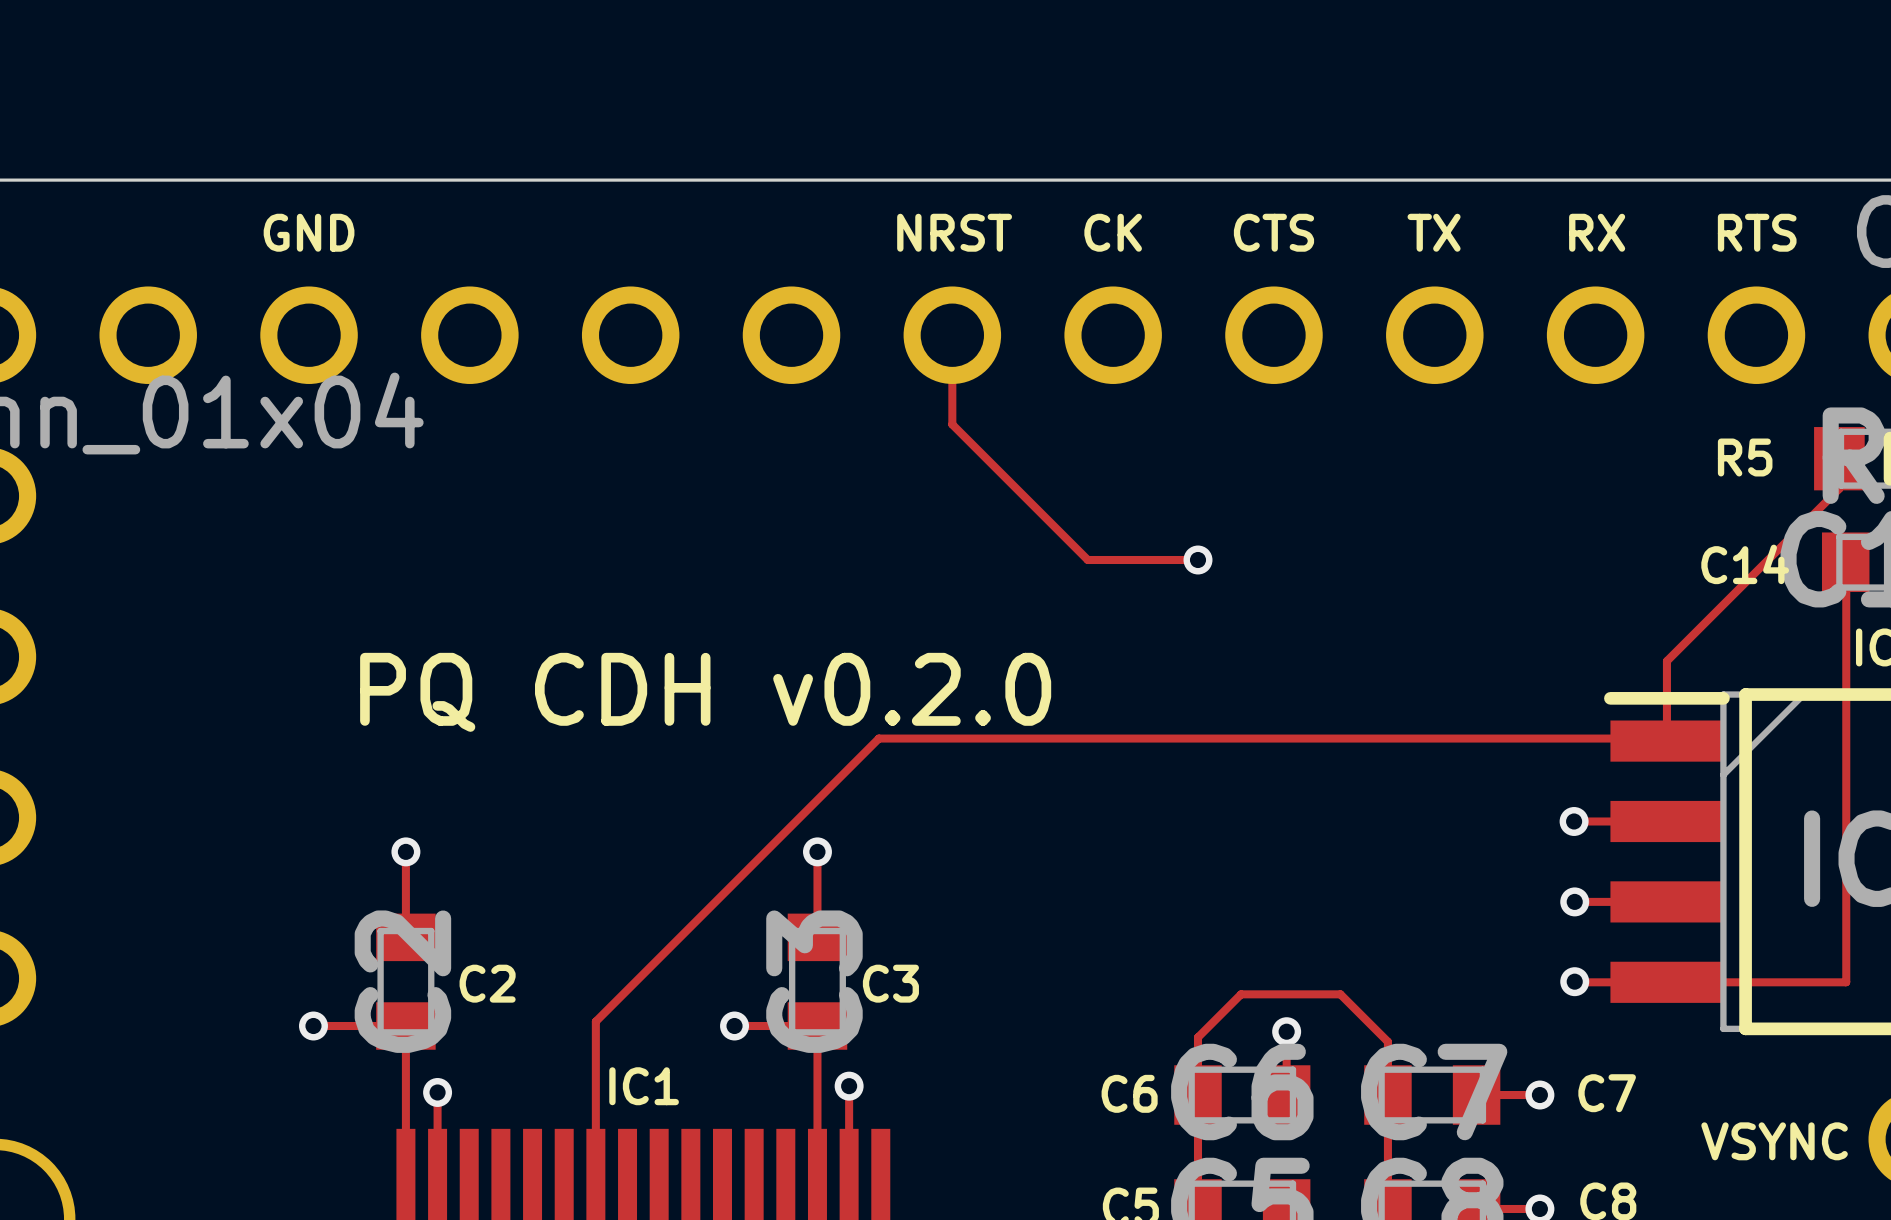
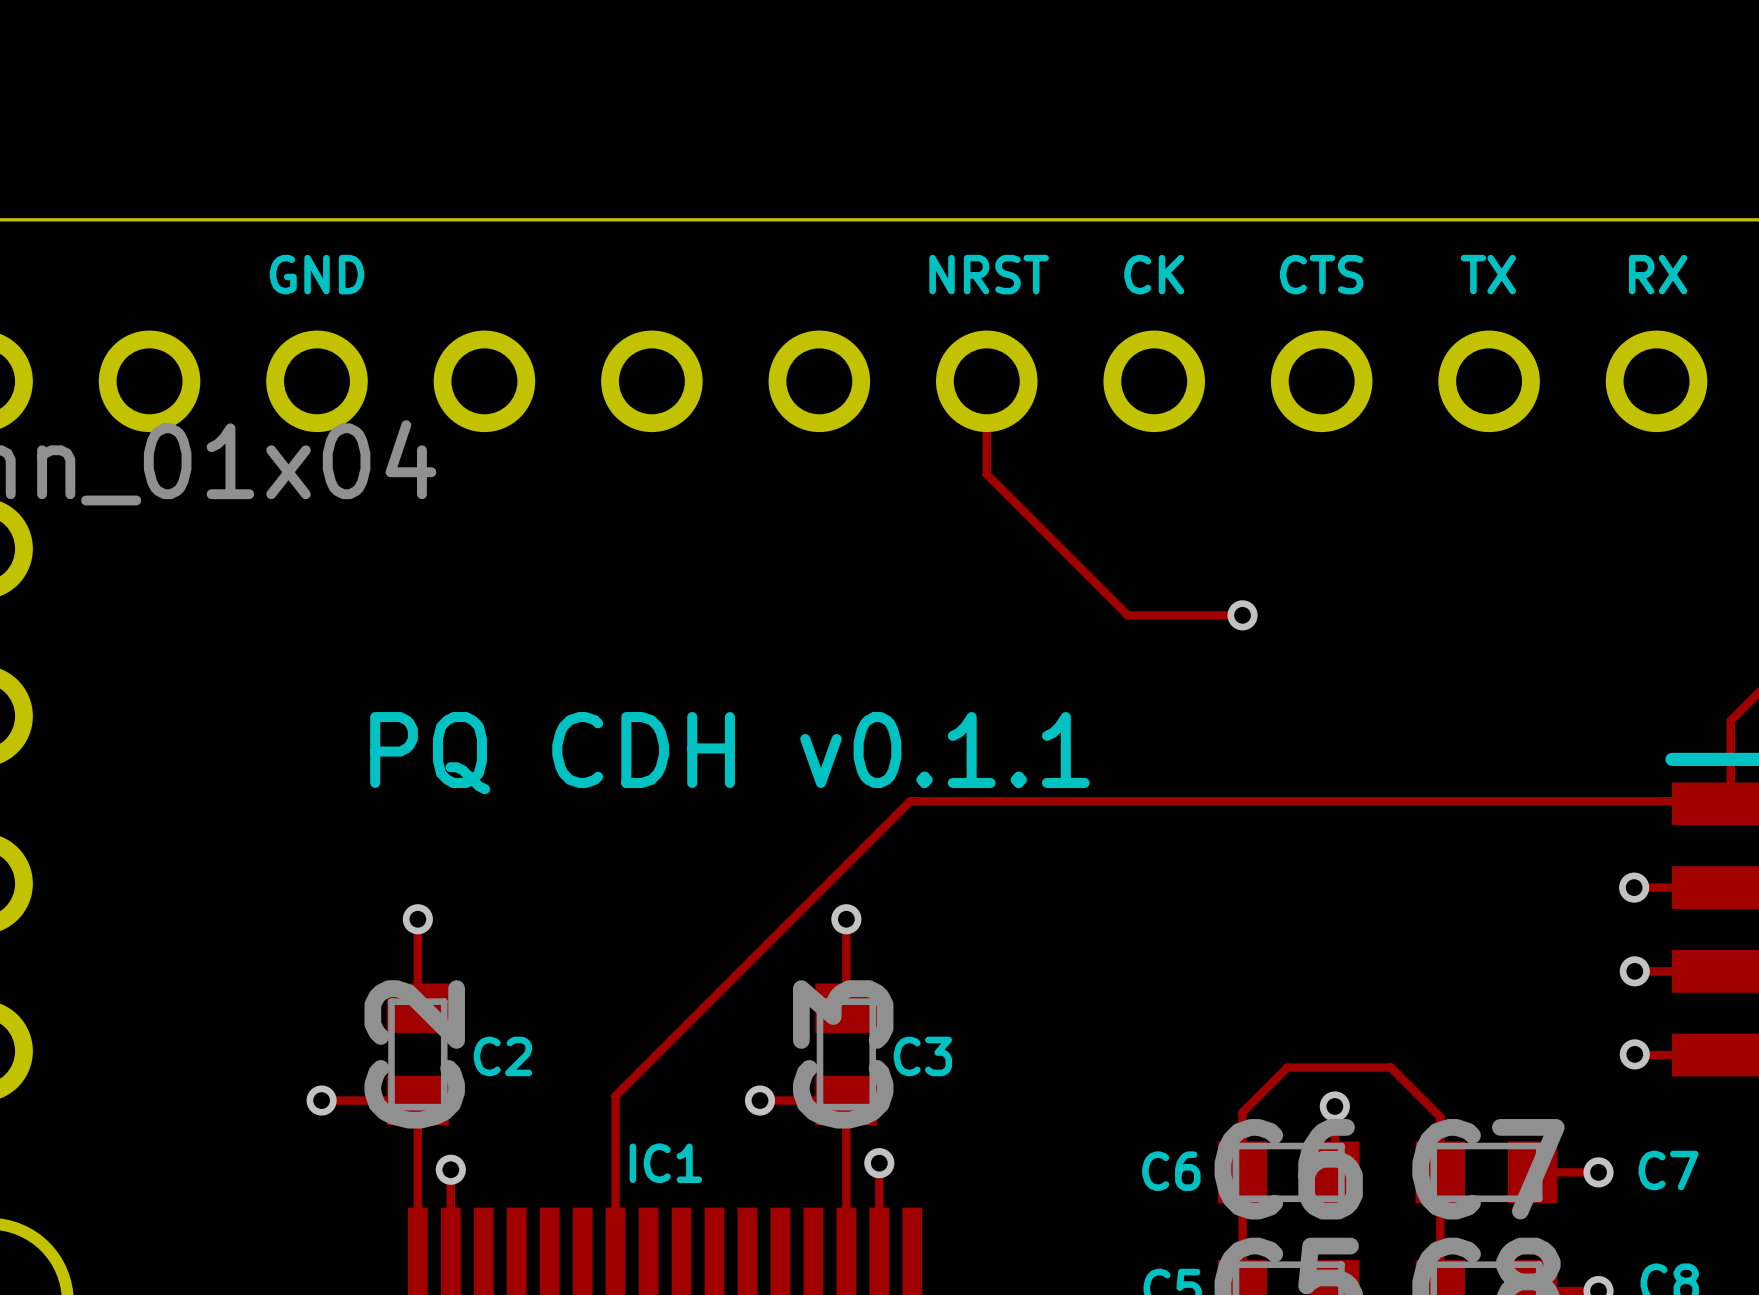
text: PQ CDH v0.2.0 (705, 692) -> PQ CDH v0.1.1 (729, 753)

